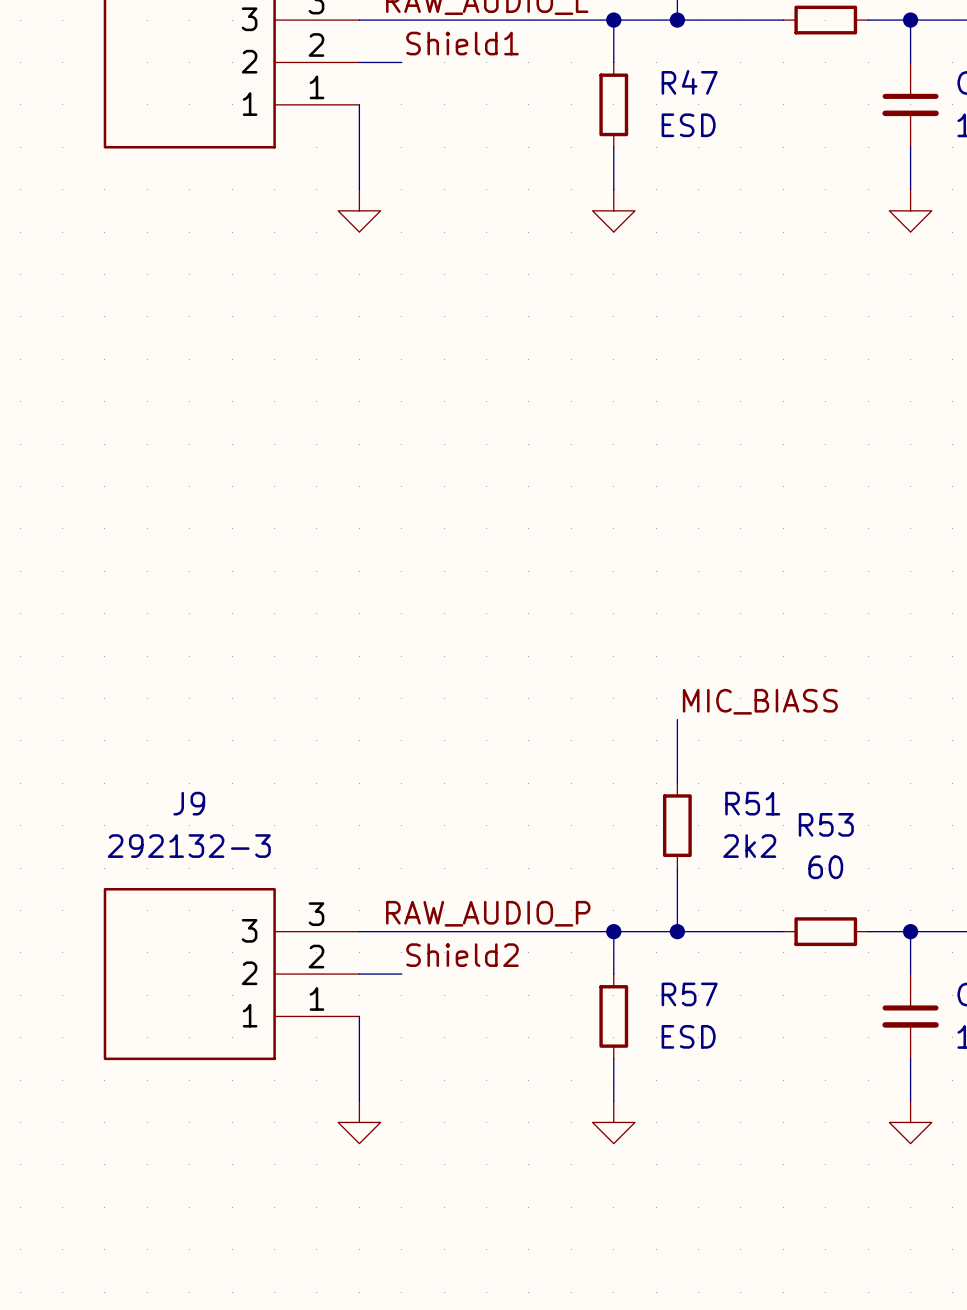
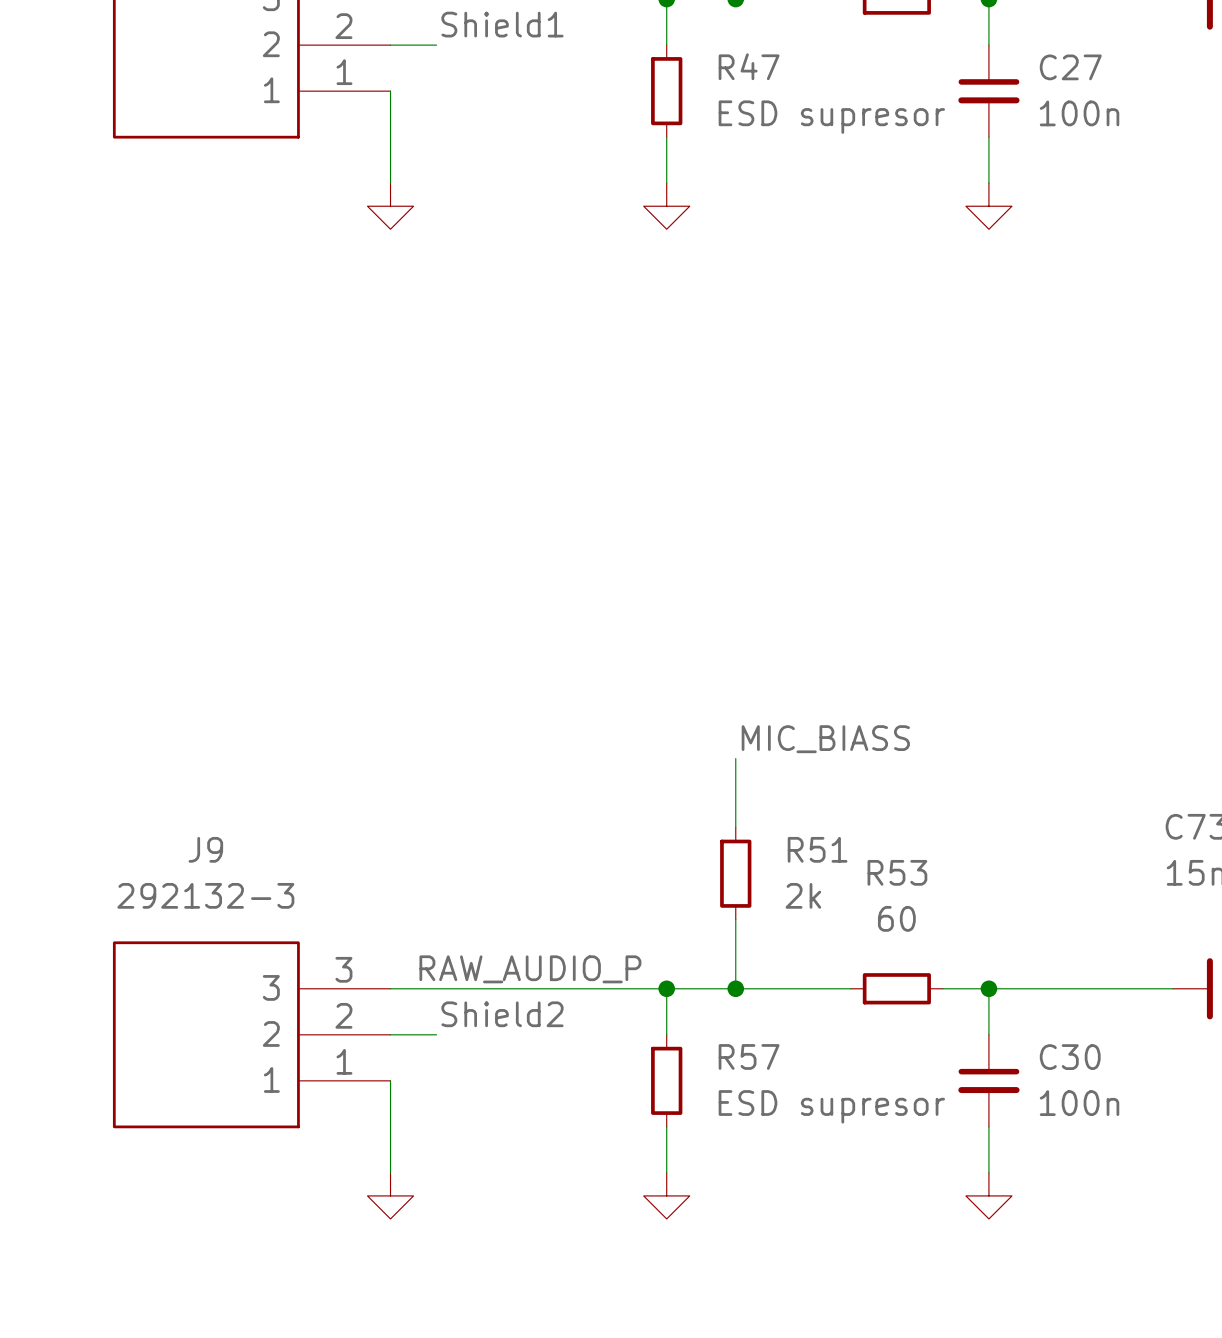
R47 value: ESD (688, 125) -> ESD supresor (831, 117)
R51 value: 2k2 (749, 846) -> 2k (803, 895)
R57 value: ESD (688, 1036) -> ESD supresor (831, 1106)

